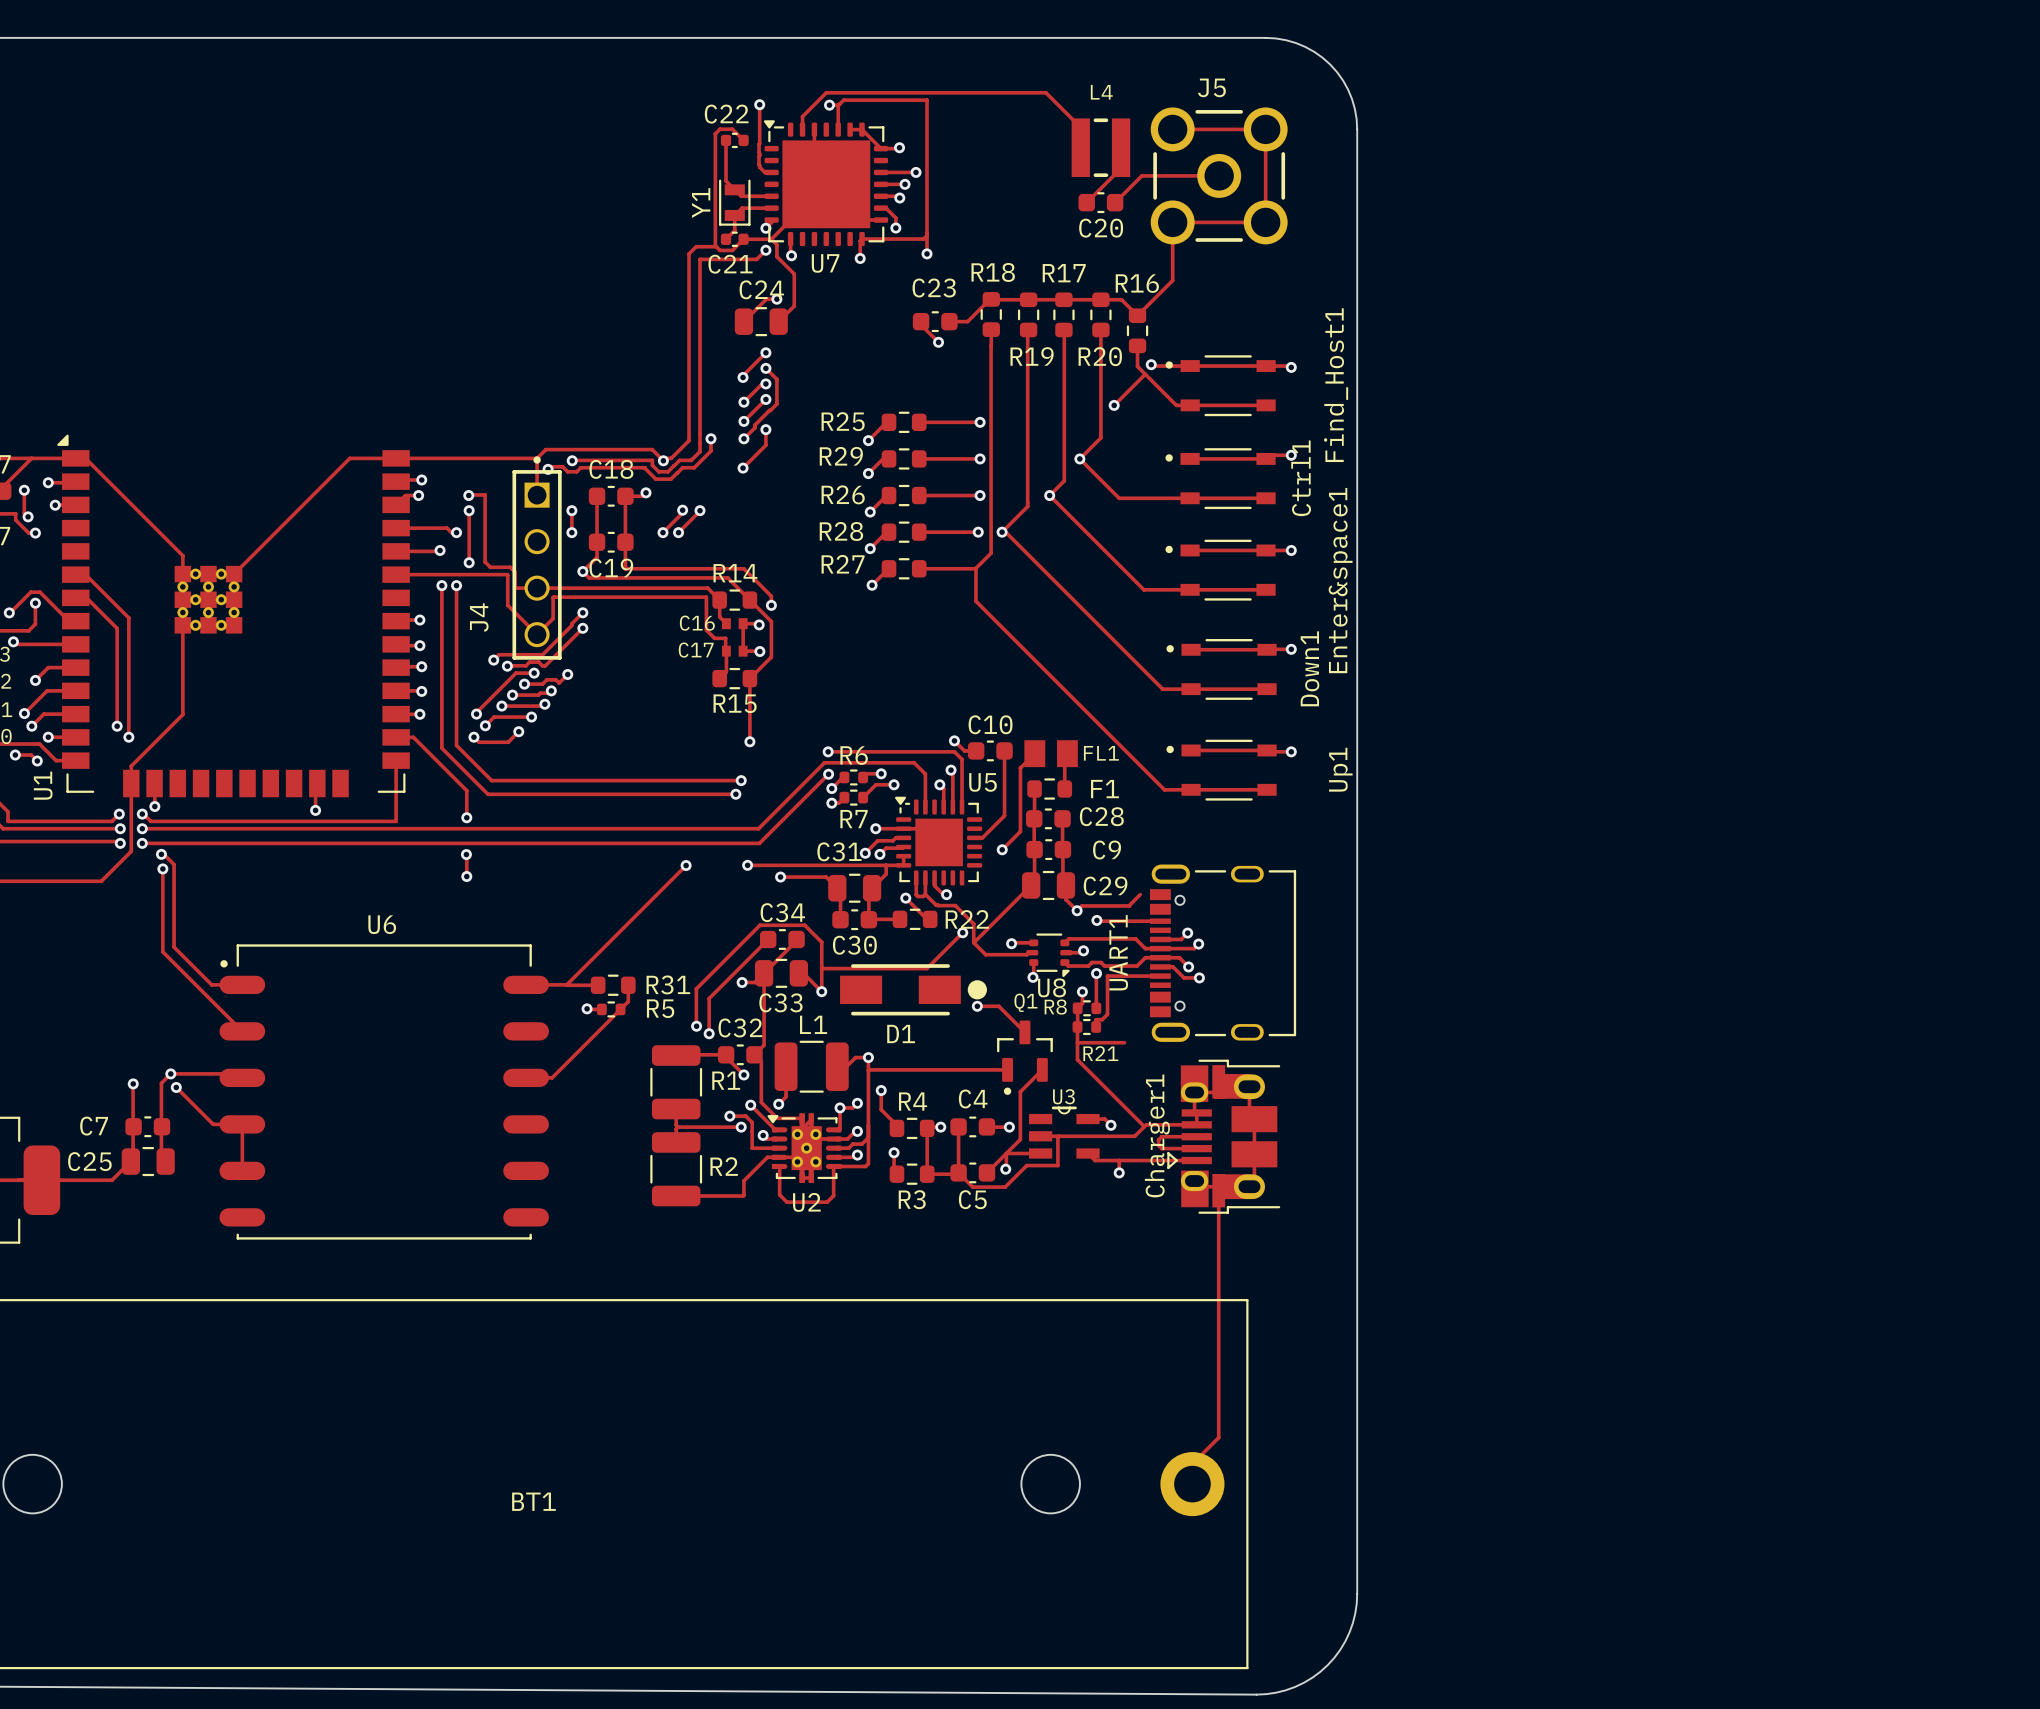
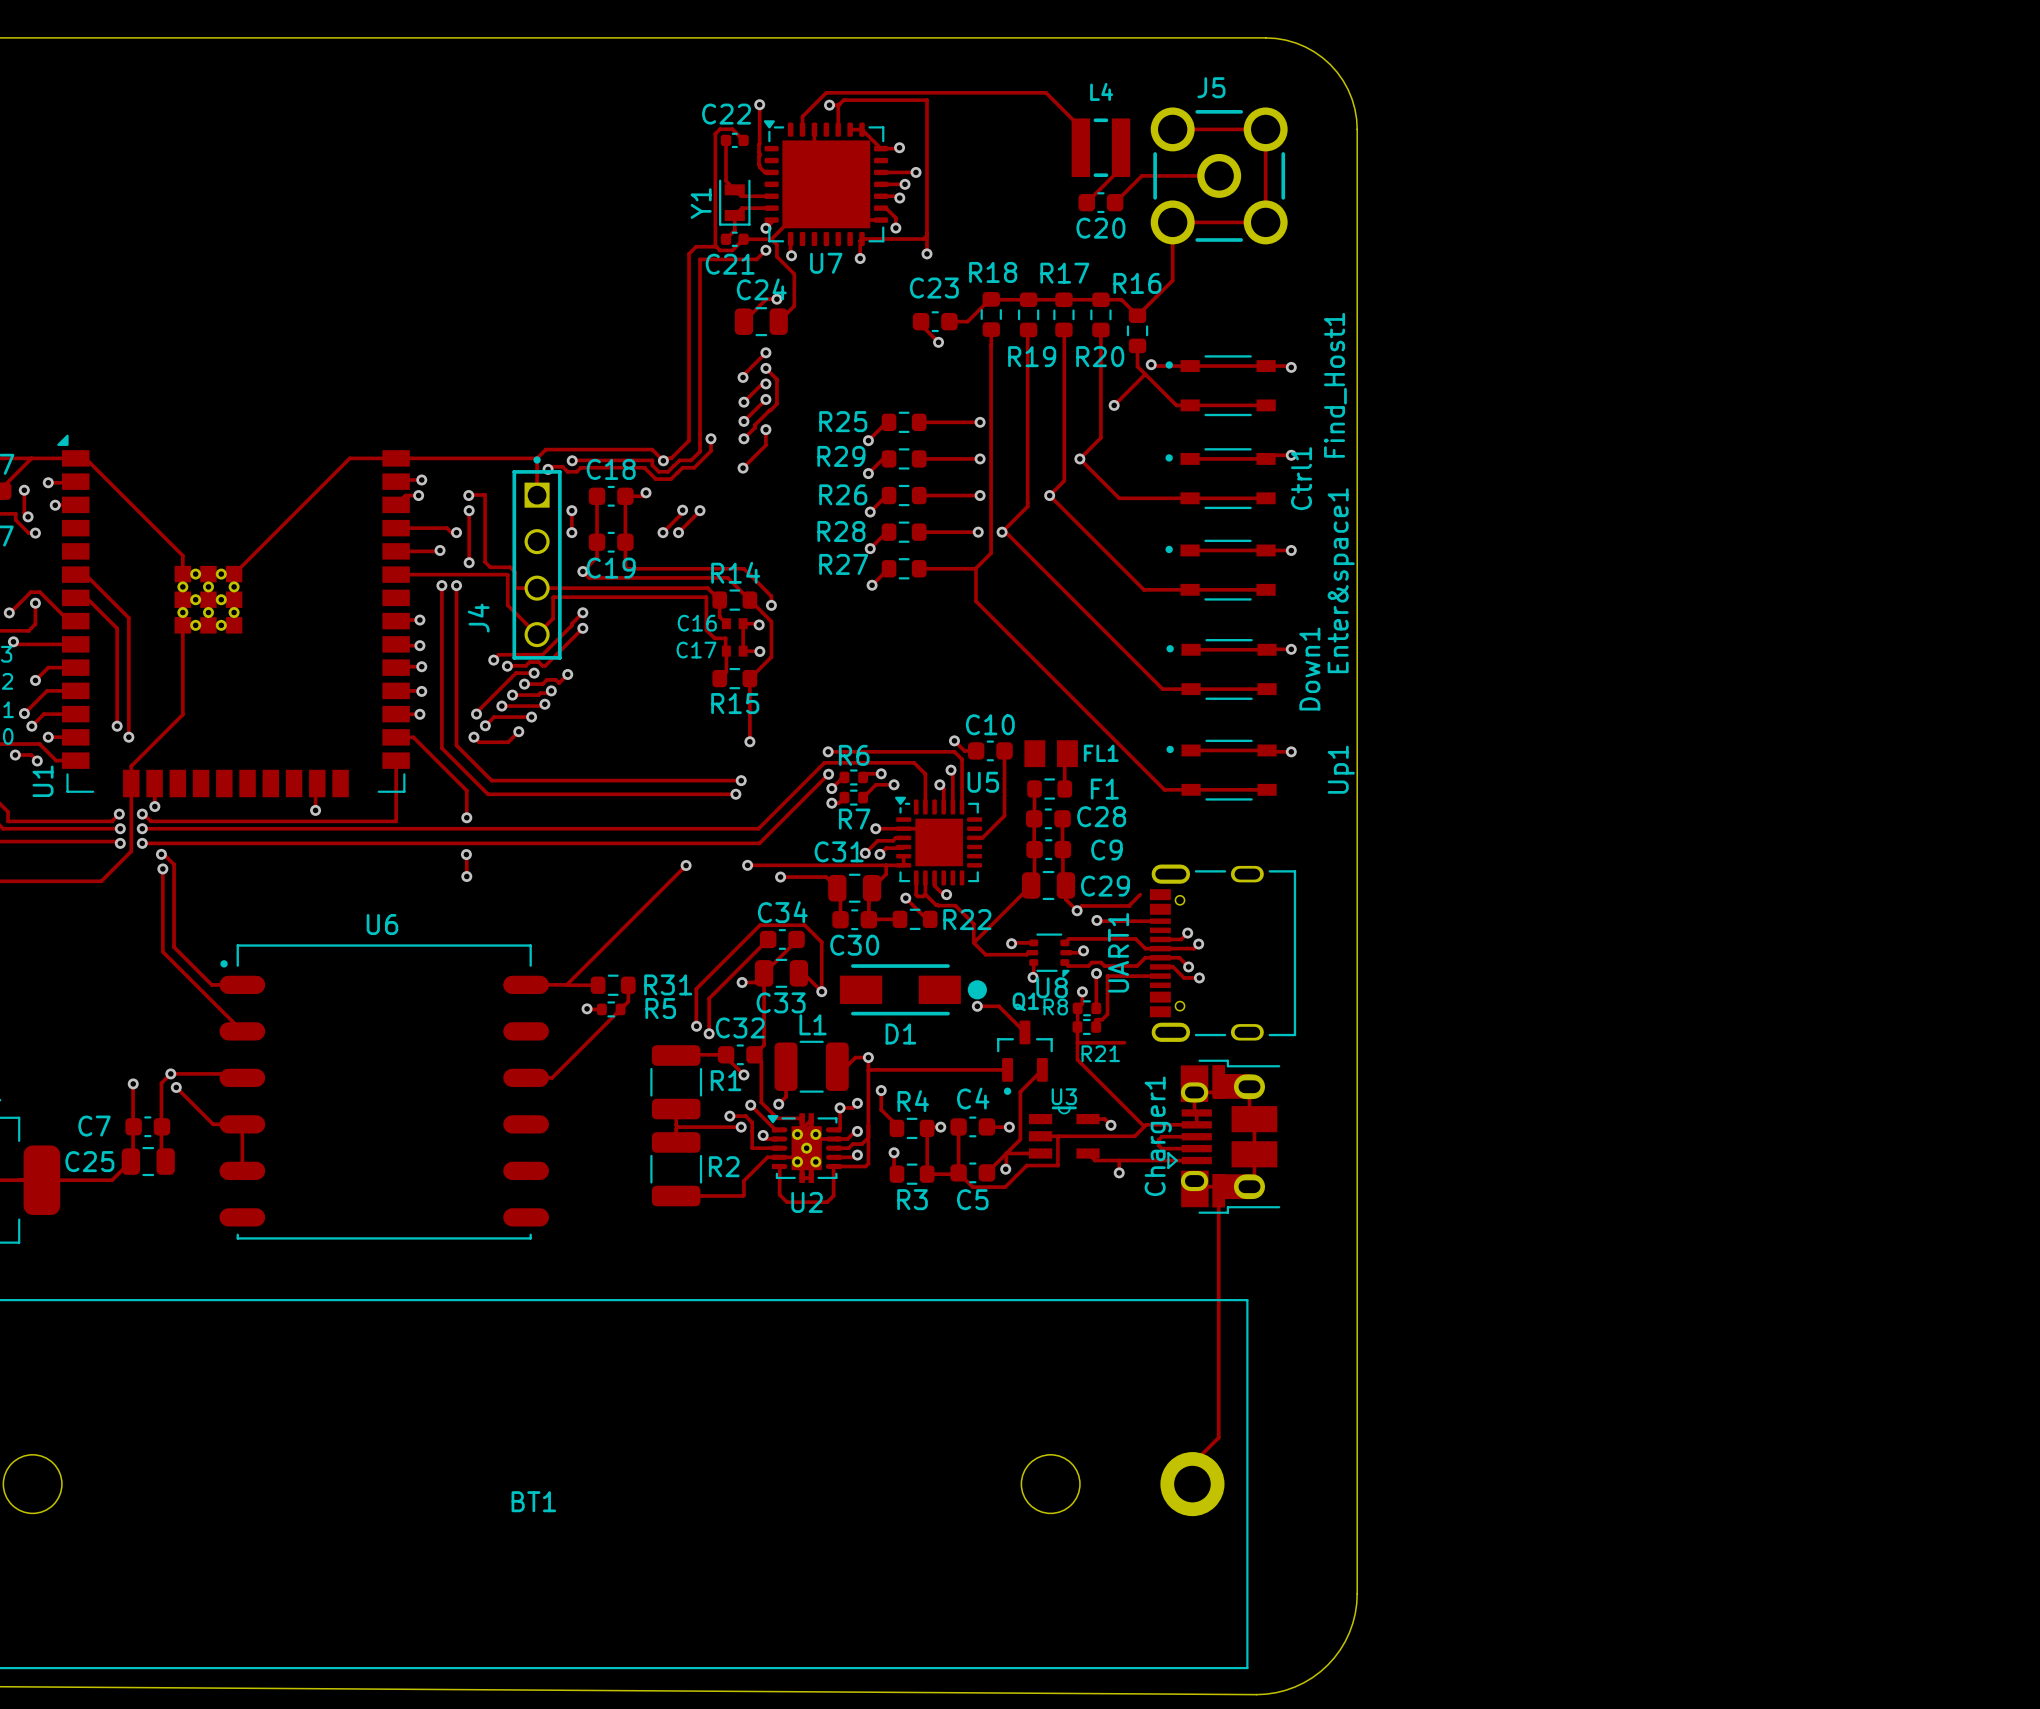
track: (1034, 753) (1020, 768) (1020, 831) (1002, 849) -> none
via: (1002, 849) -> none
track: (962, 932) (926, 968) (821, 967) -> none
via: (962, 932) -> none

